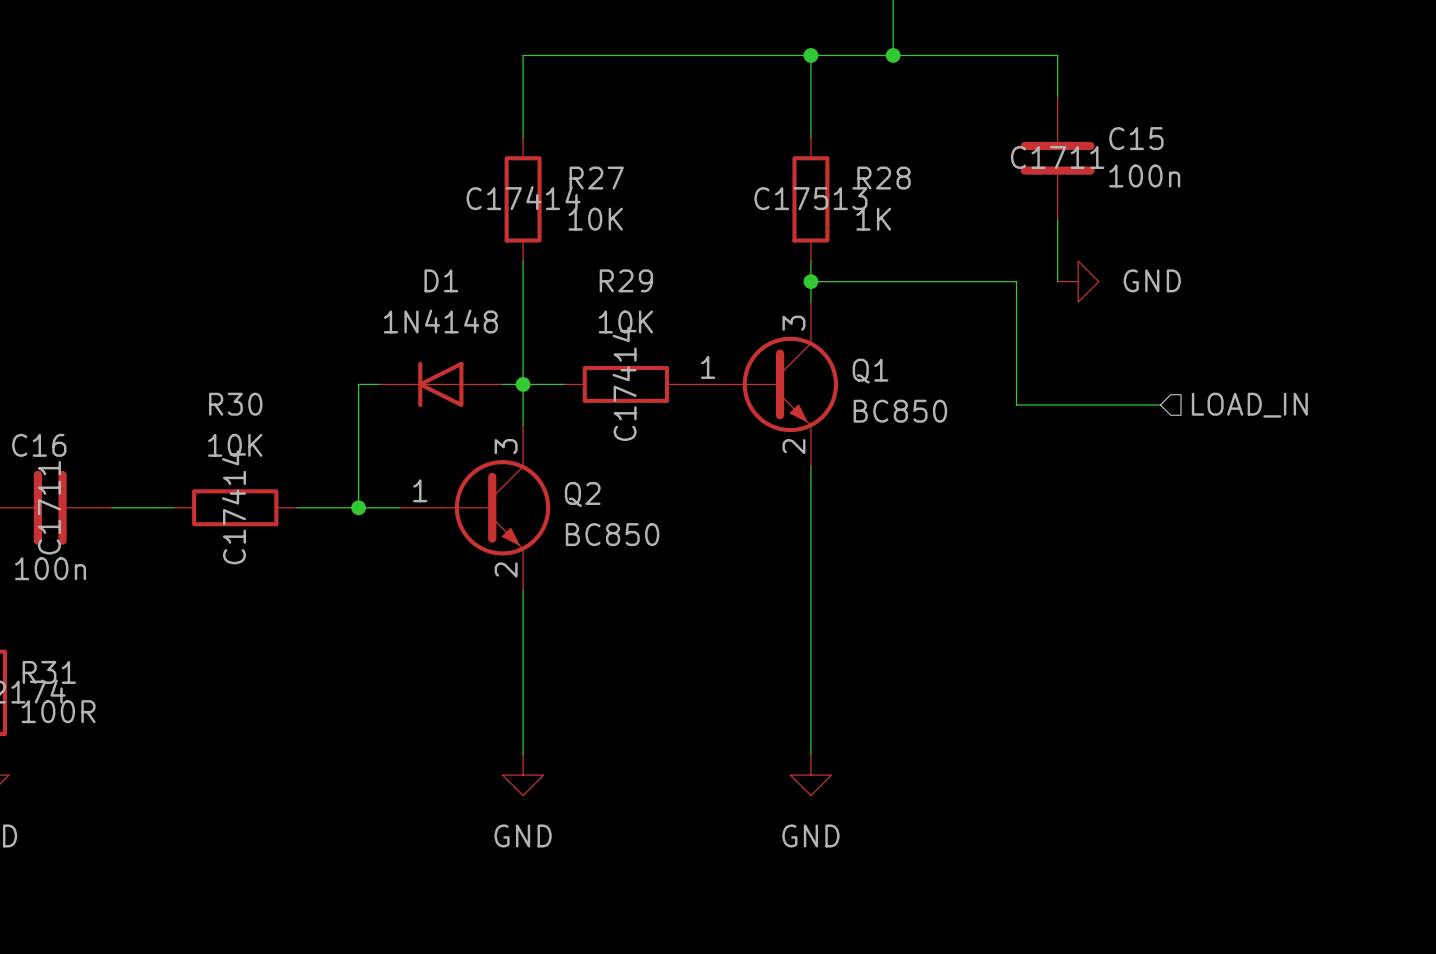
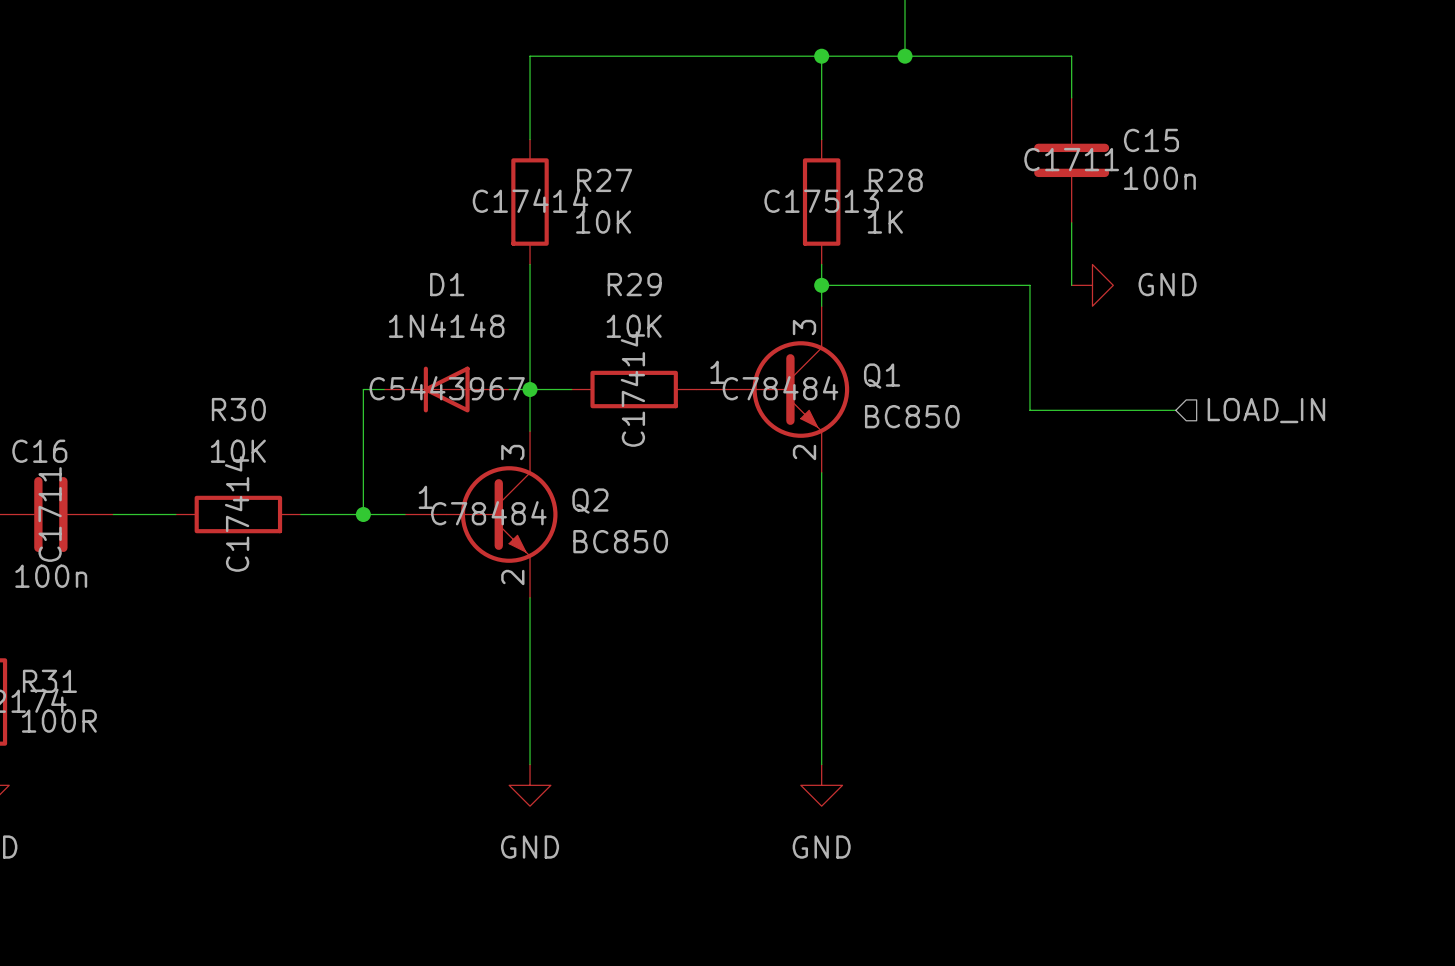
D1 text: none -> C5443967 (447, 388)
Q1 text: none -> C78484 (780, 388)
Q2 text: none -> C78484 (488, 513)

